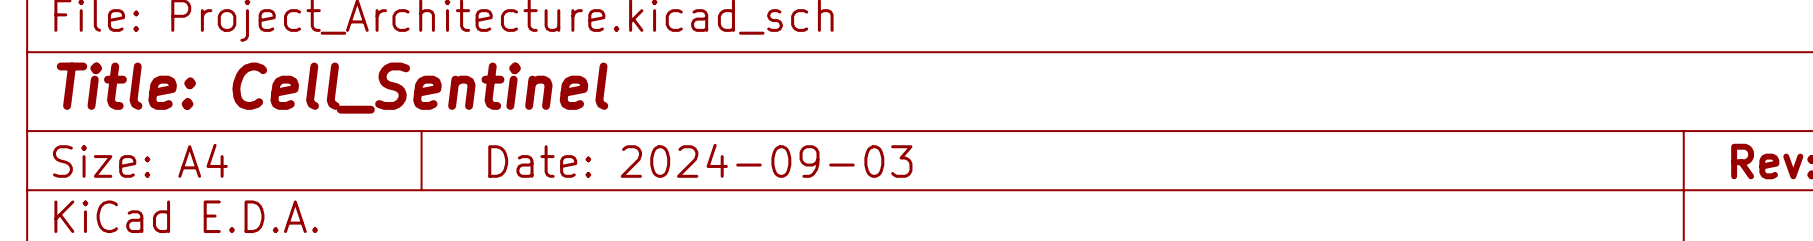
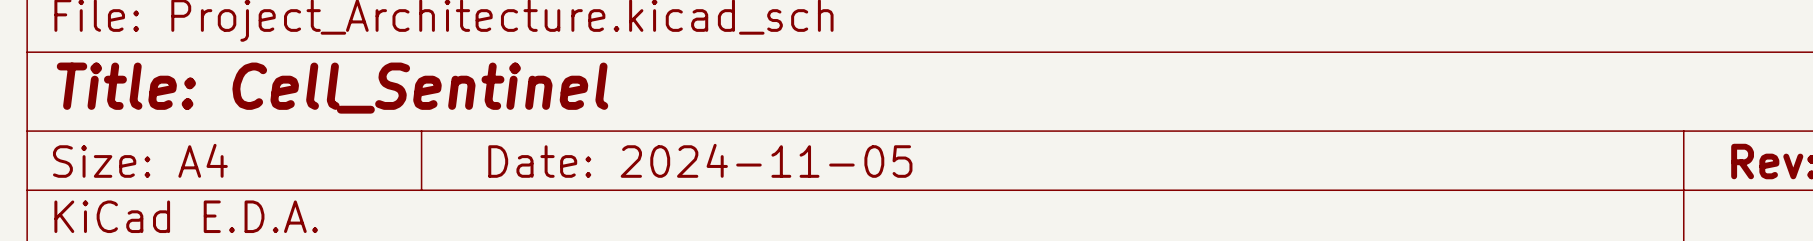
title block: Date: 2024-09-03 (700, 160) -> Date: 2024-11-05 (700, 160)

